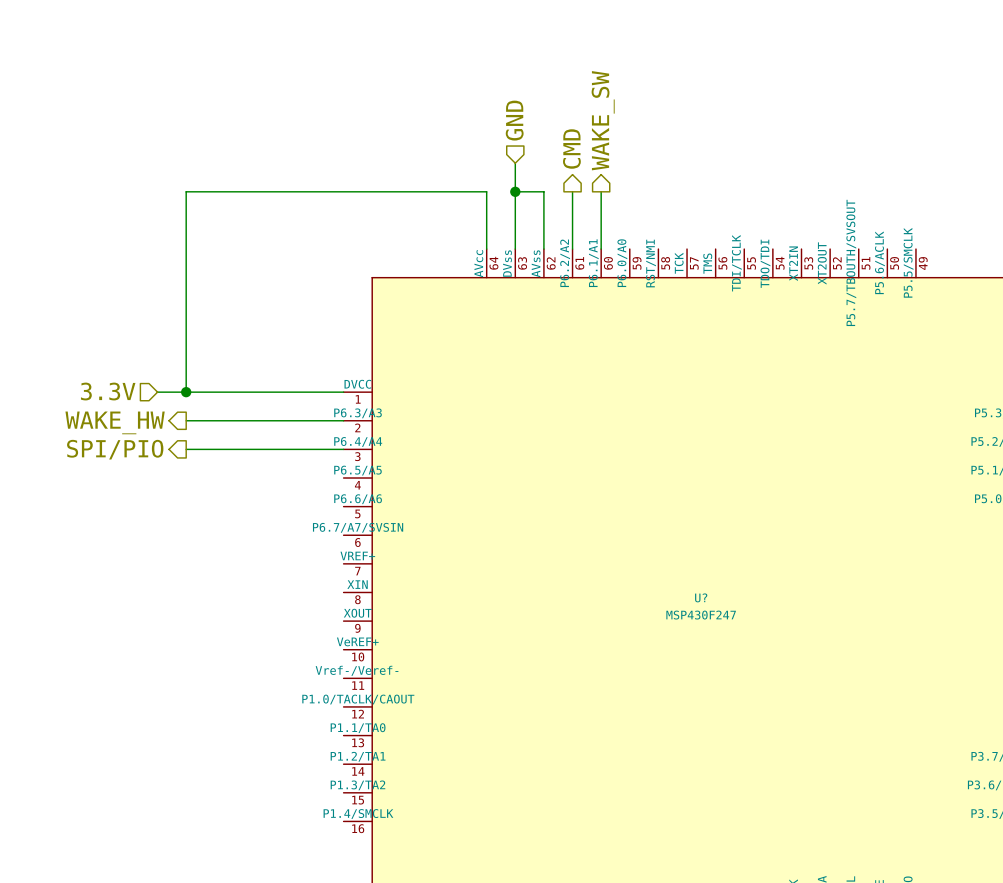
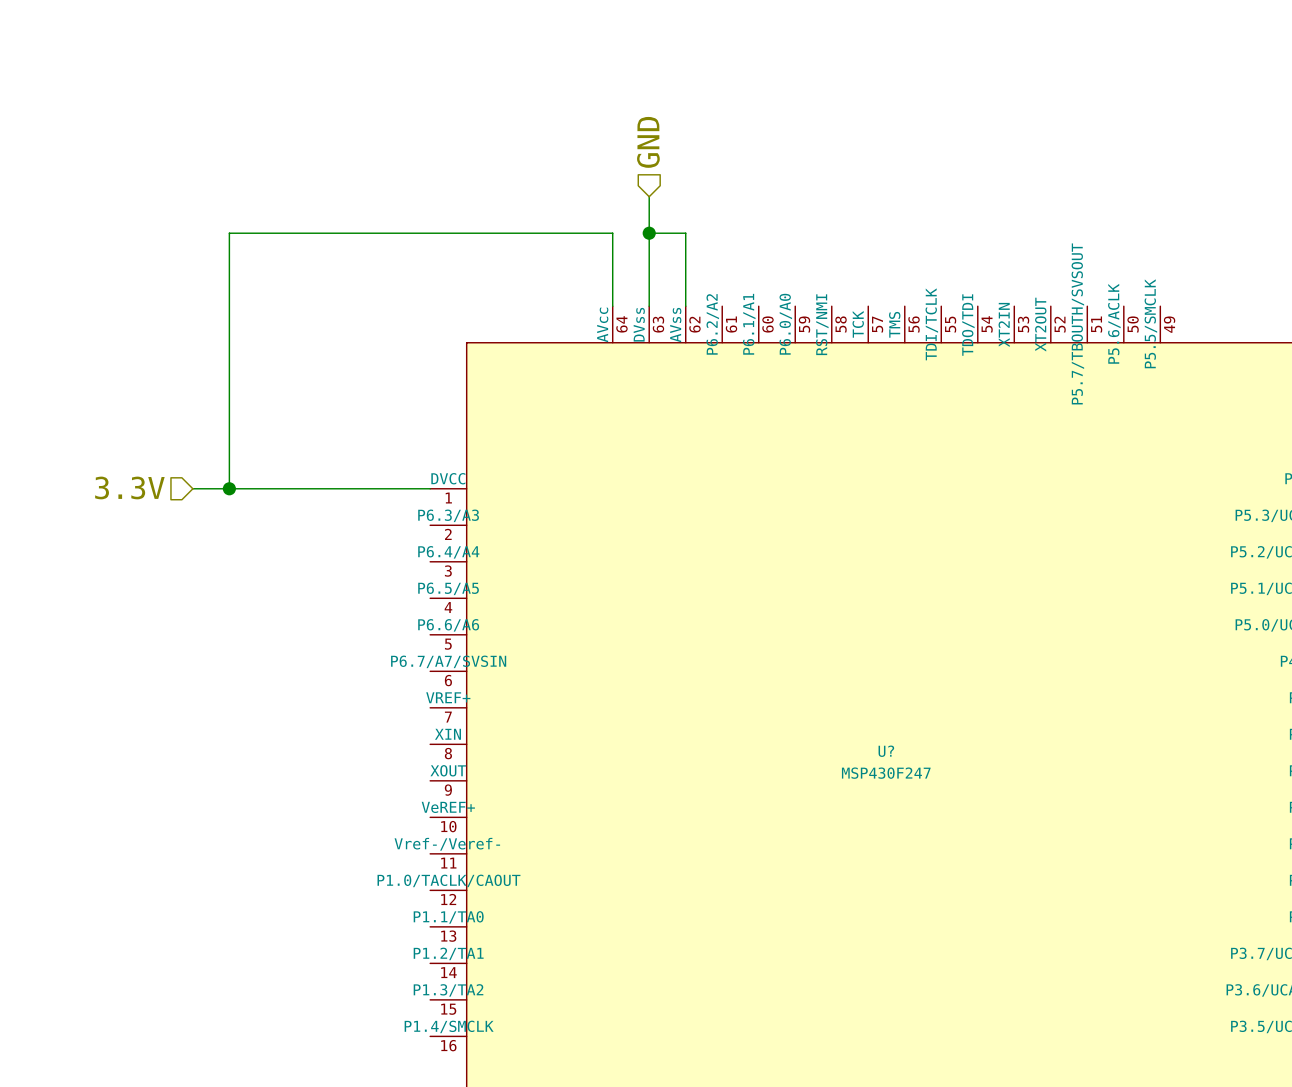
hierarchical label: WAKE_SW (603, 120) -> none
hierarchical label: CMD (571, 149) -> none
wire: (572, 191) (572, 249) -> none
wire: (601, 191) (601, 249) -> none
wire: (186, 420) (343, 420) -> none
hierarchical label: WAKE_HW (115, 422) -> none
hierarchical label: SPI/PIO (115, 449) -> none
wire: (186, 449) (343, 449) -> none

